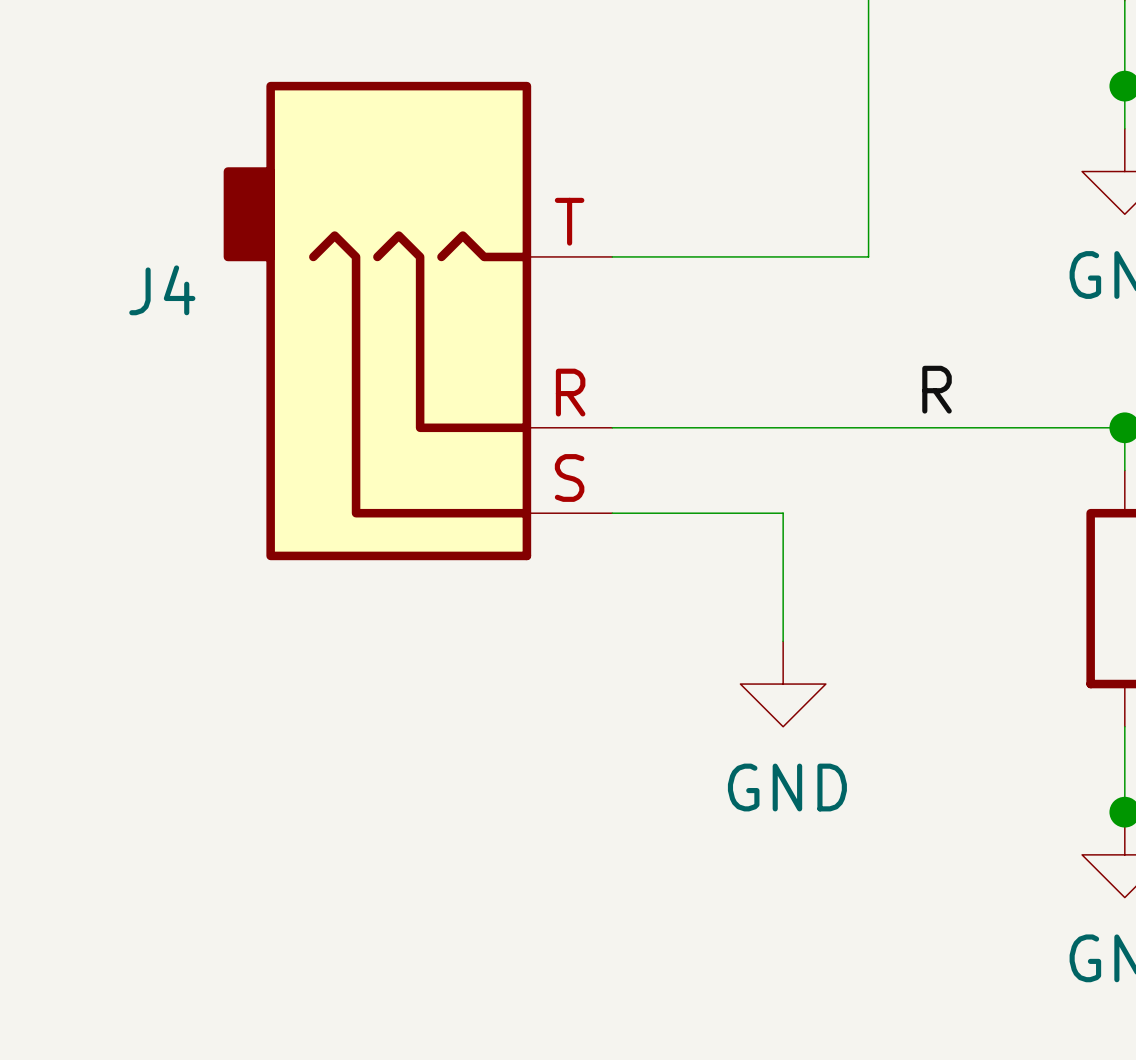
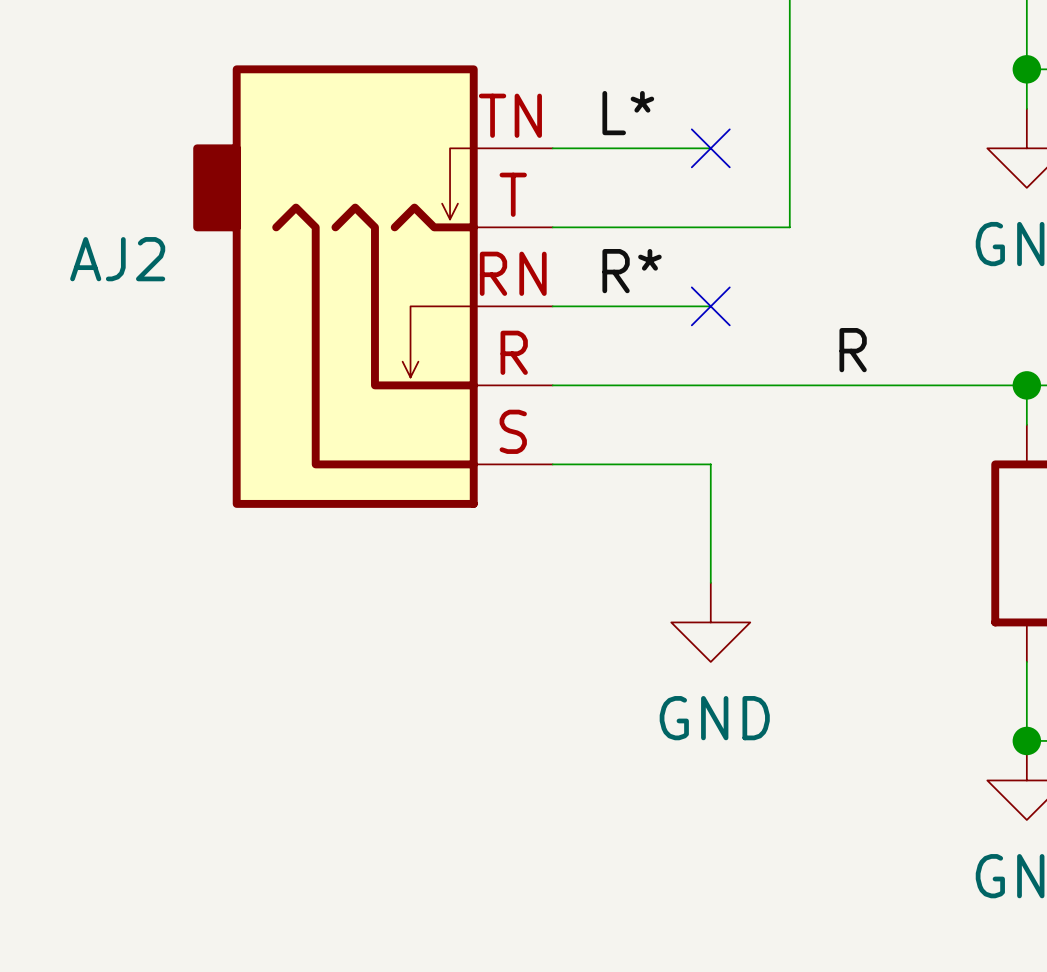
label: none -> L* (628, 113)
wire: none -> (552, 148) (710, 148)
no-connect mark: none -> (710, 148)
label: none -> R* (632, 271)
J4: (417, 321) -> none
AJ2: none -> (372, 286)
wire: none -> (552, 306) (710, 306)
no-connect mark: none -> (710, 306)

